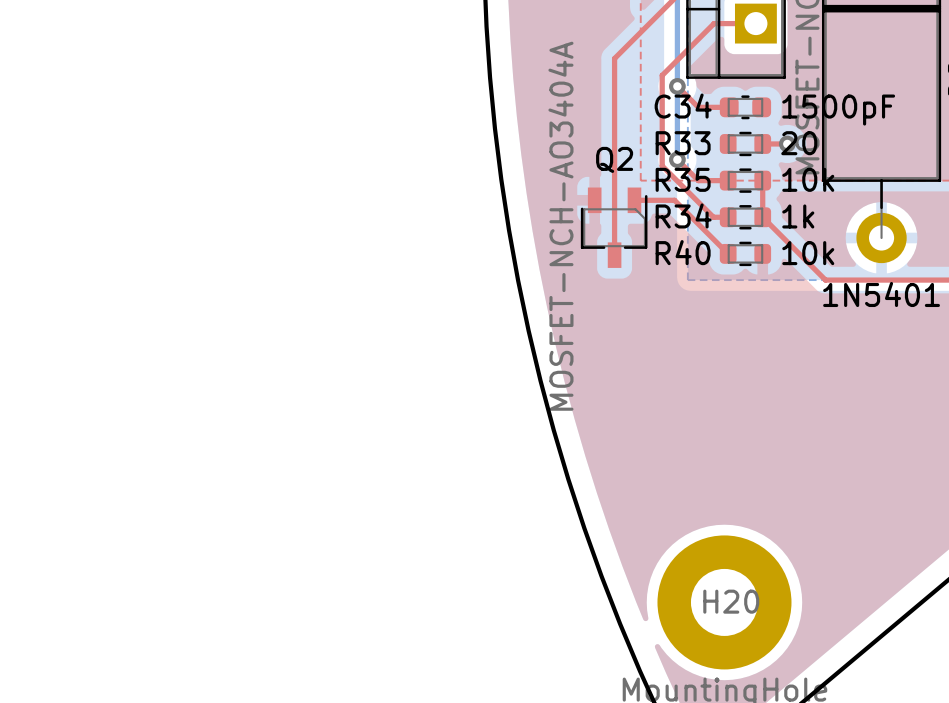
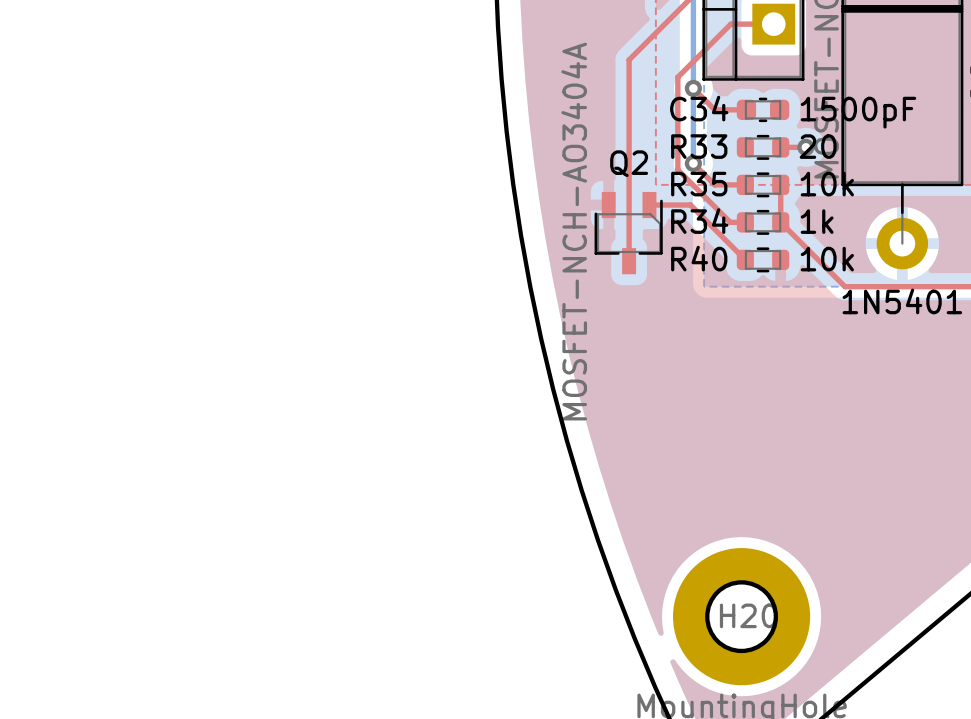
round board edge: none -> [705, 580, 779, 654]

